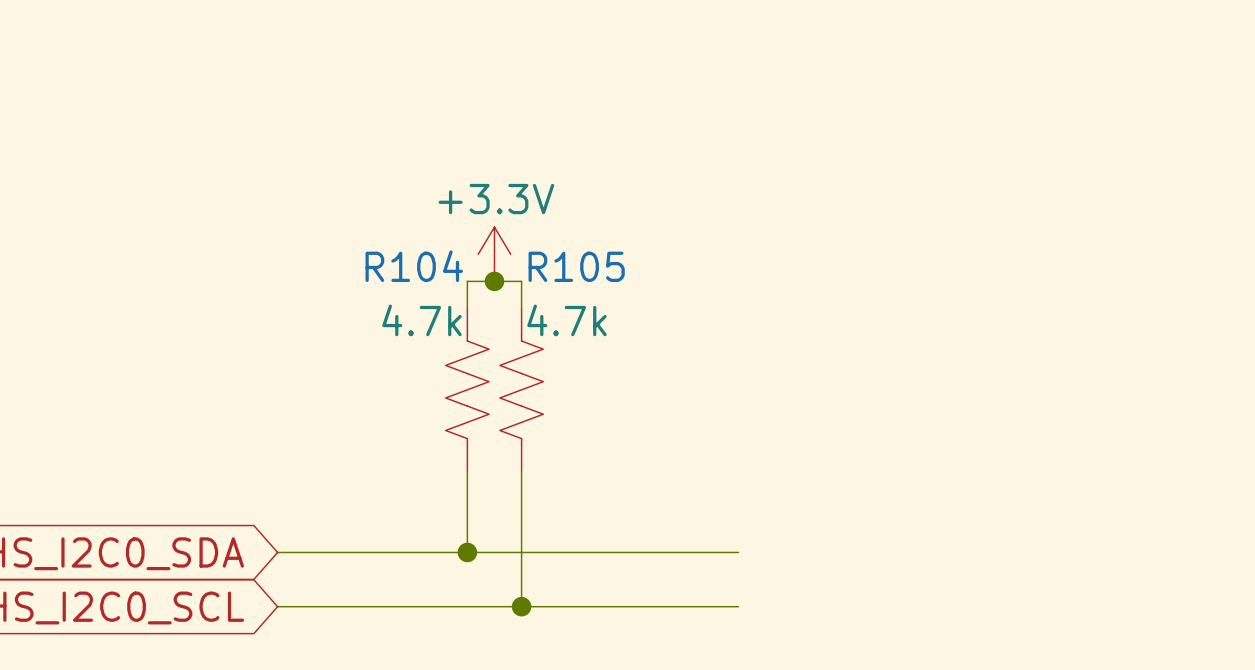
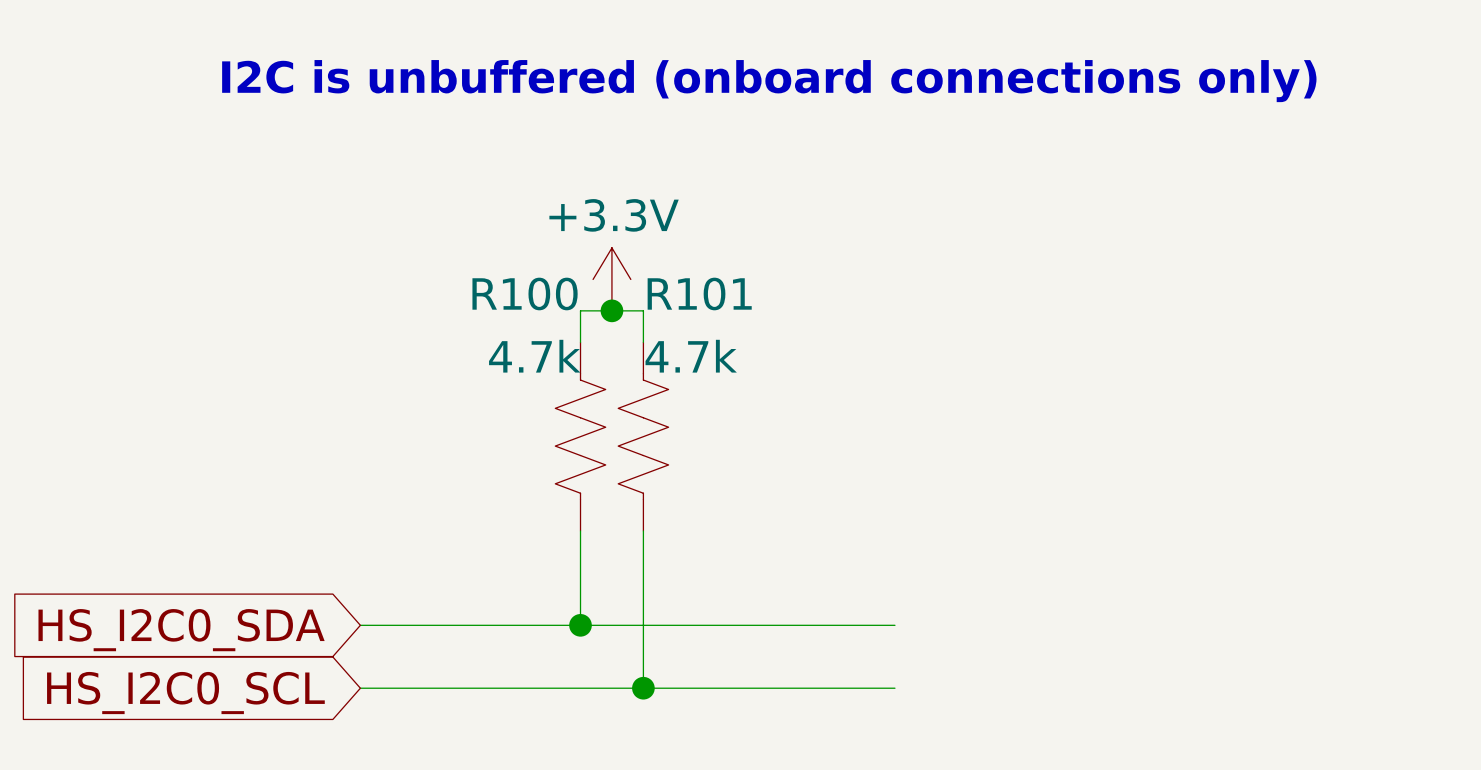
text: none -> I2C is unbuffered (onboard connections only) (769, 81)
R104 name: R104 (414, 266) -> R100 (525, 293)
R105 name: R105 (576, 266) -> R101 (699, 293)

